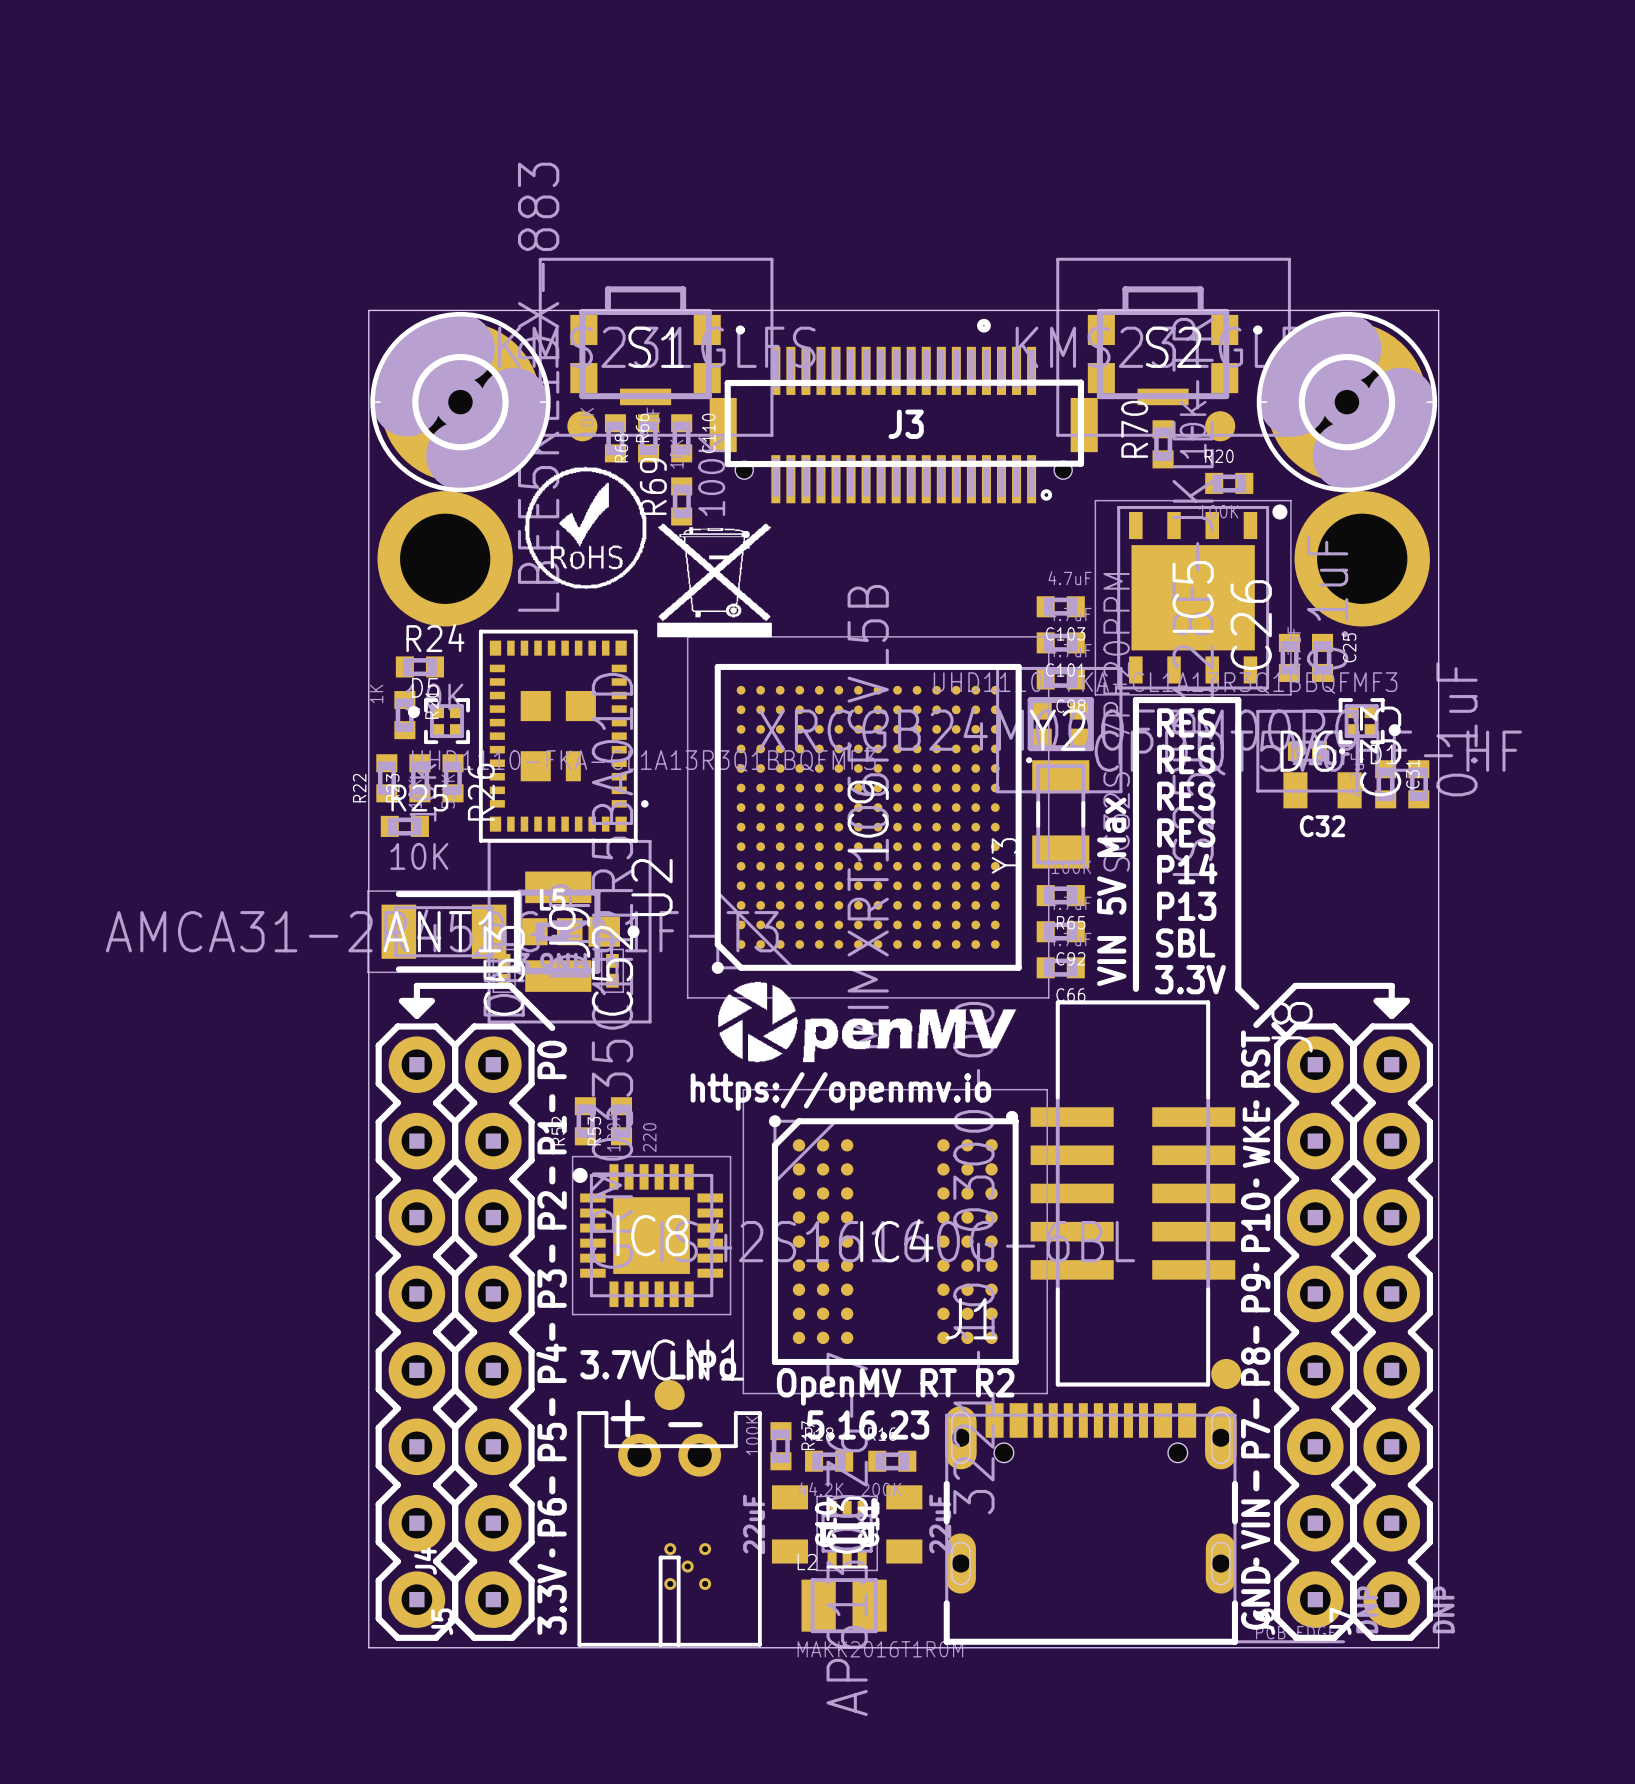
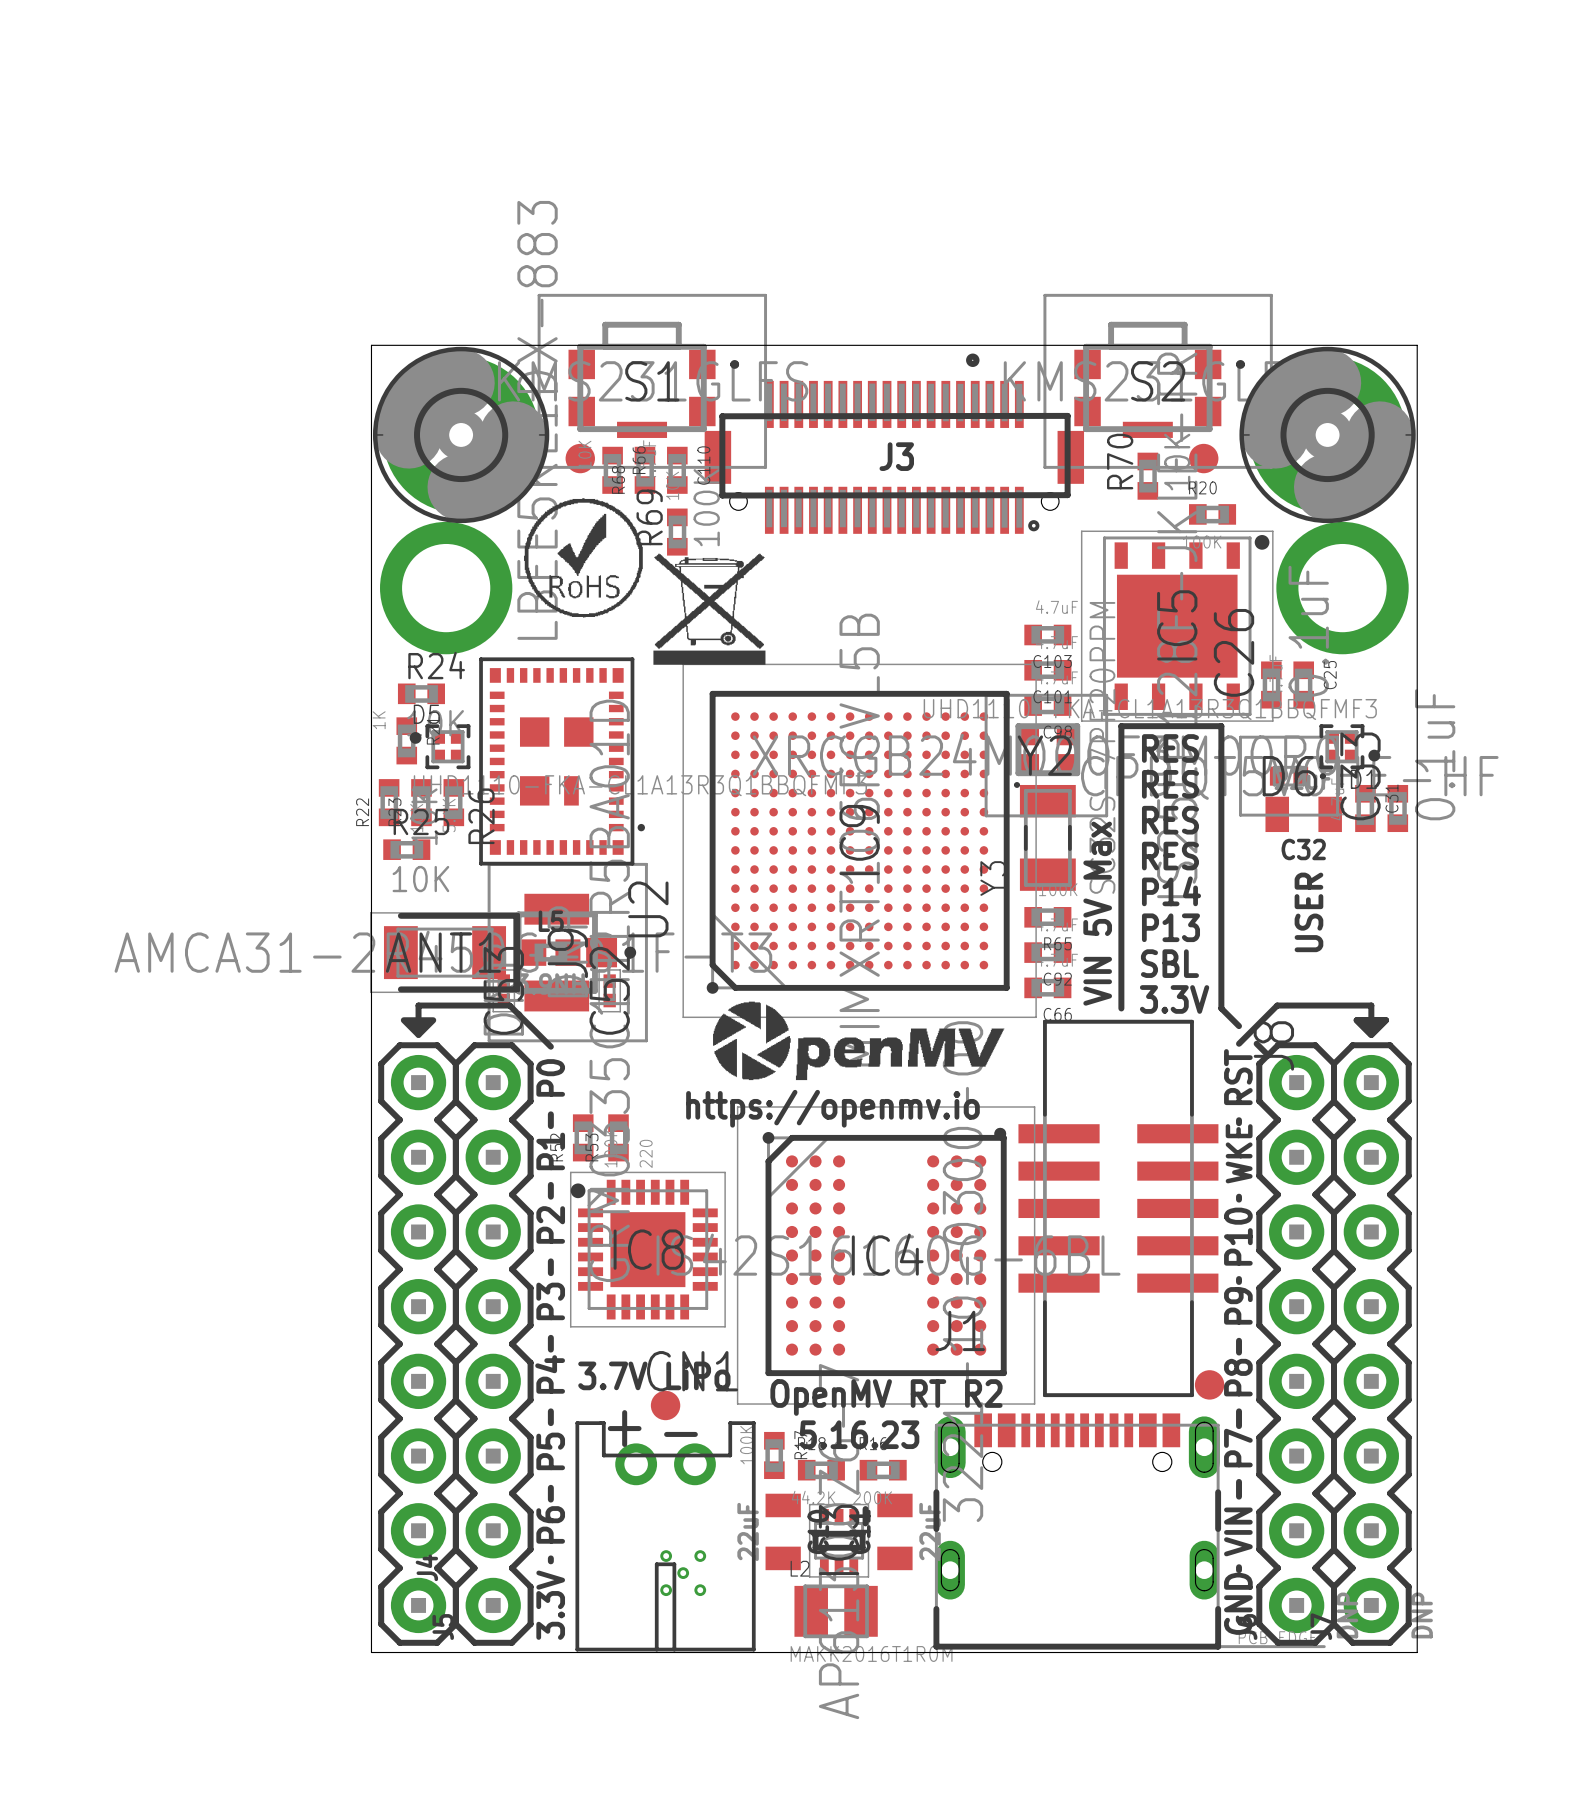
text: none -> USER (1308, 912)

